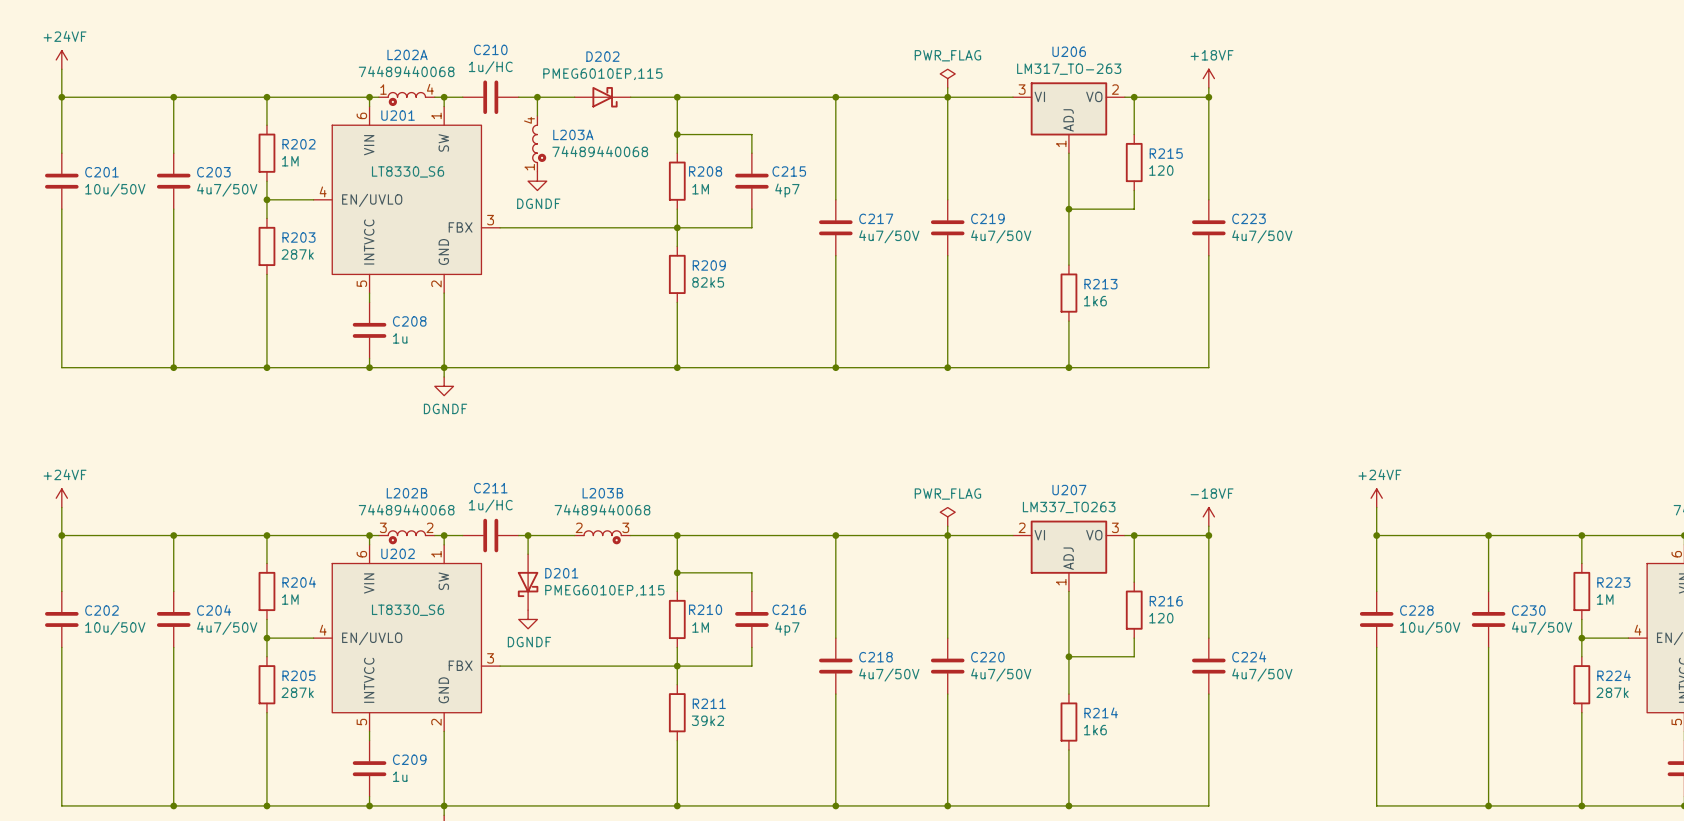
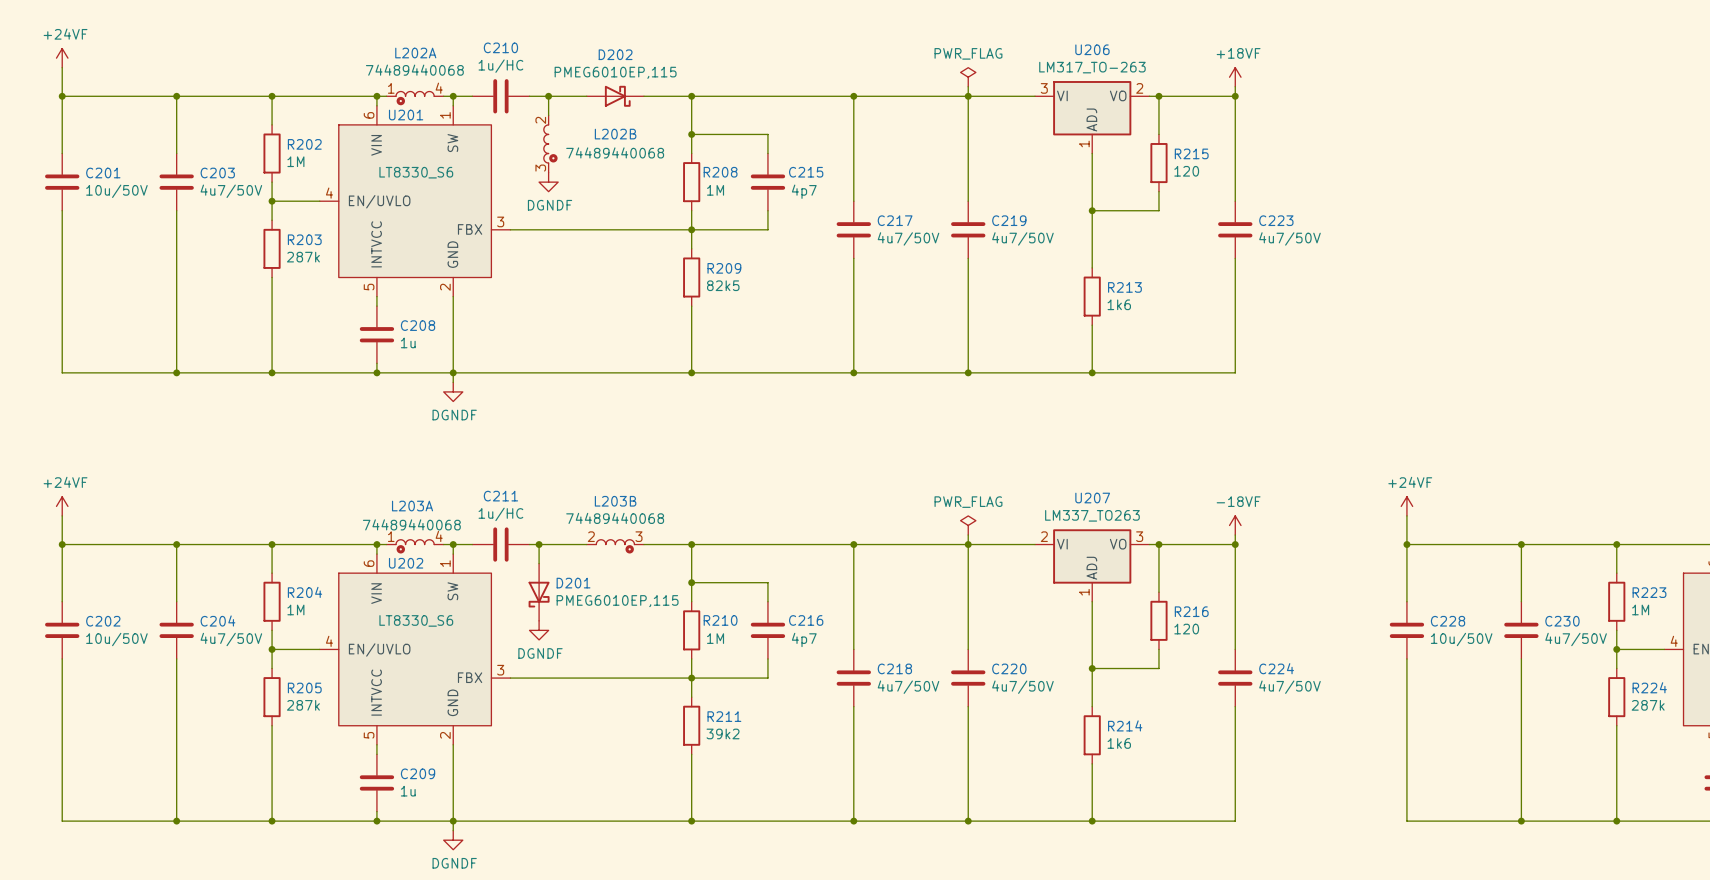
L203A name position: L203A (573, 134) -> L203A (412, 506)
L203A rotation: 0° (539, 143) -> 90° clockwise (415, 546)
L203A position: (539, 143) -> (415, 546)
L203A value position: 74489440068 (600, 151) -> 74489440068 (411, 524)
L202B name position: L202B (407, 493) -> L202B (615, 134)
L202B value position: 74489440068 (406, 509) -> 74489440068 (615, 152)
L202B rotation: 0° (406, 537) -> 90° counterclockwise (550, 143)
L202B position: (406, 537) -> (550, 143)

